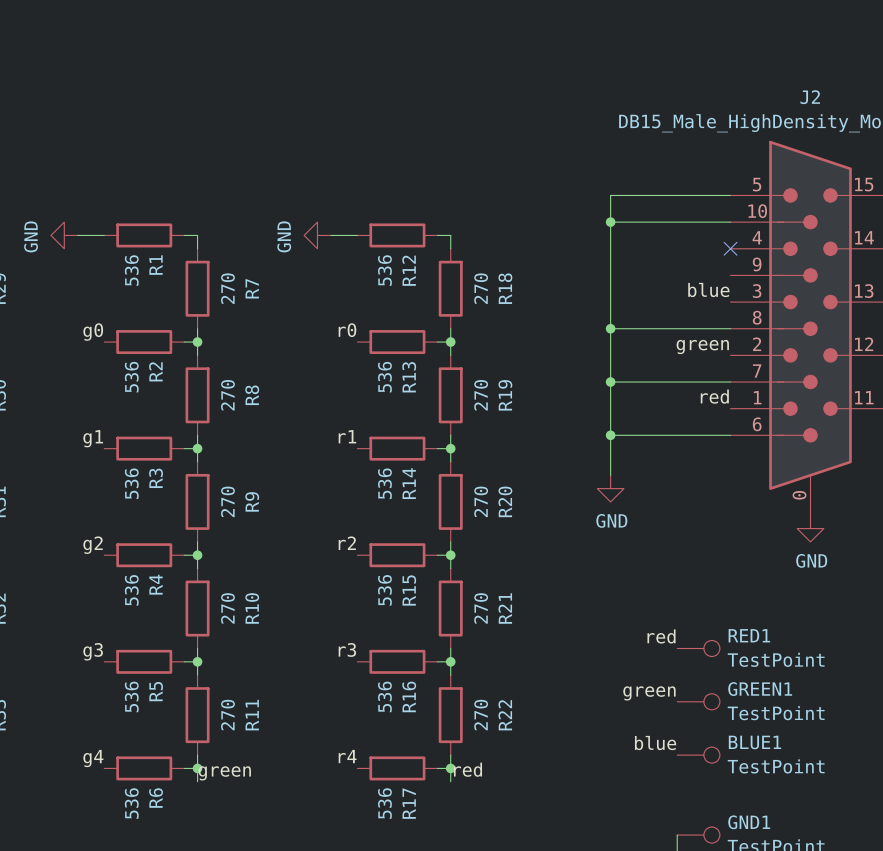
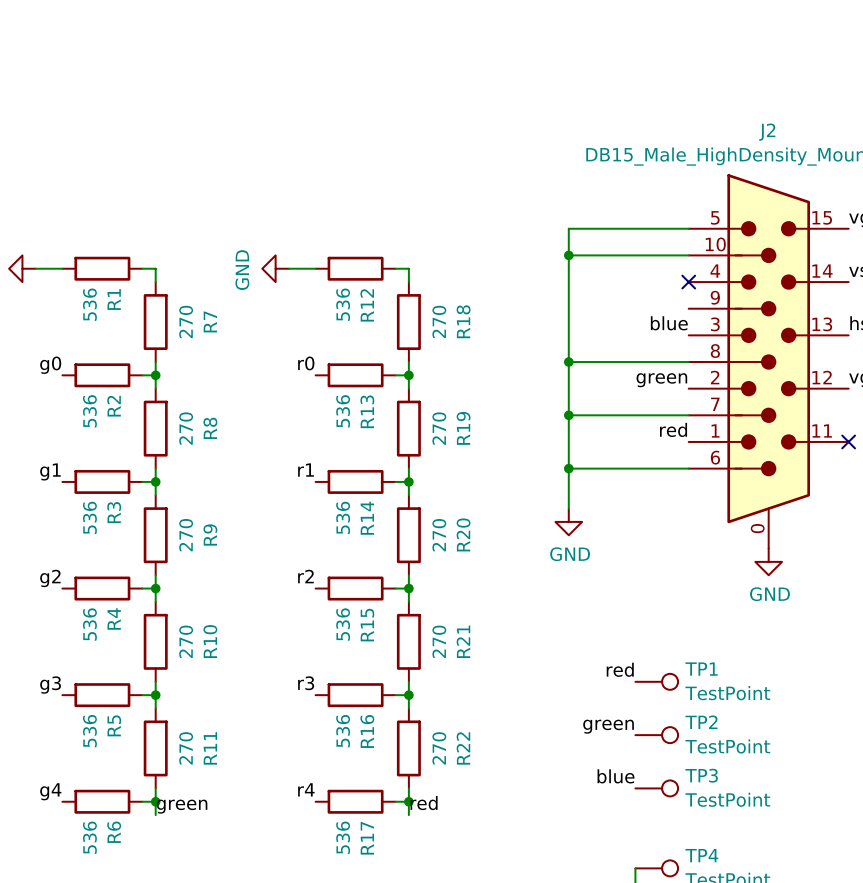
RED1 name: RED1 (749, 635) -> TP1 (701, 669)
GREEN1 name: GREEN1 (760, 689) -> TP2 (701, 722)
BLUE1 name: BLUE1 (754, 742) -> TP3 (701, 775)
GND1 name: GND1 (749, 822) -> TP4 (701, 855)

